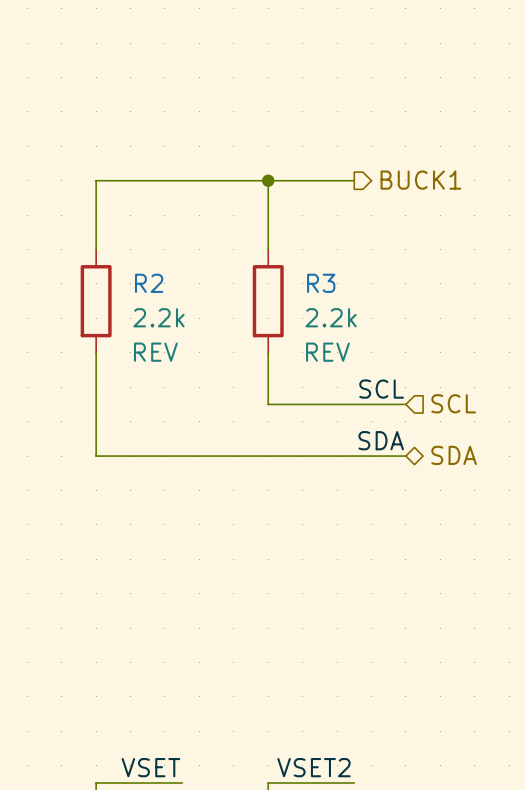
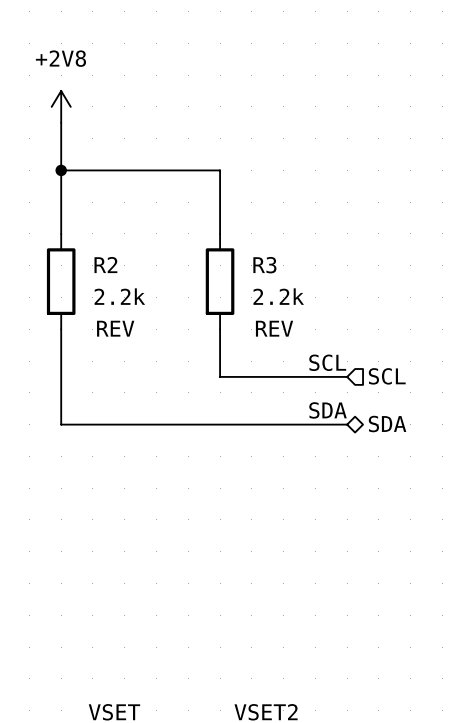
power symbol: none -> +2V8 (61, 106)
wire: none -> (61, 122) (61, 170)
junction: none -> (61, 170)
wire: (268, 180) (354, 180) -> none
junction: (268, 180) -> none
hierarchical label: BUCK1 (420, 180) -> none

